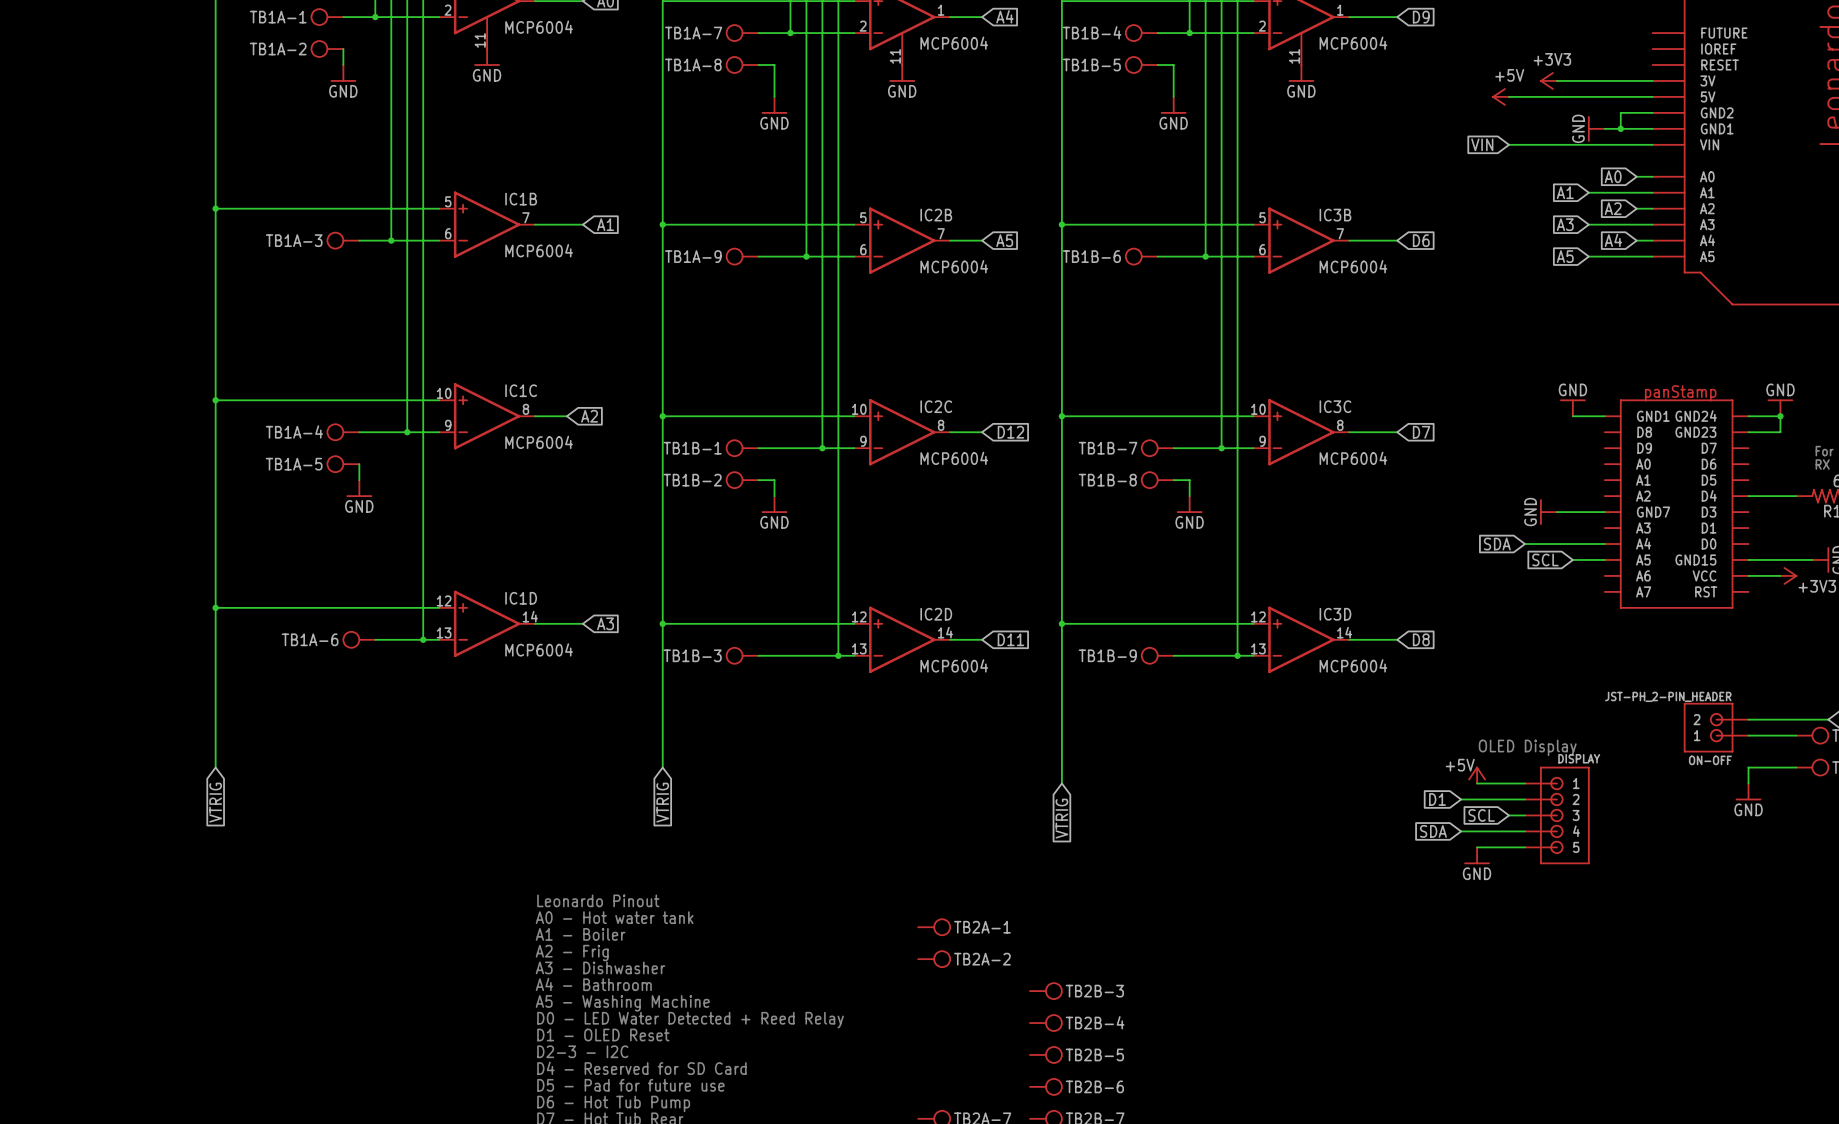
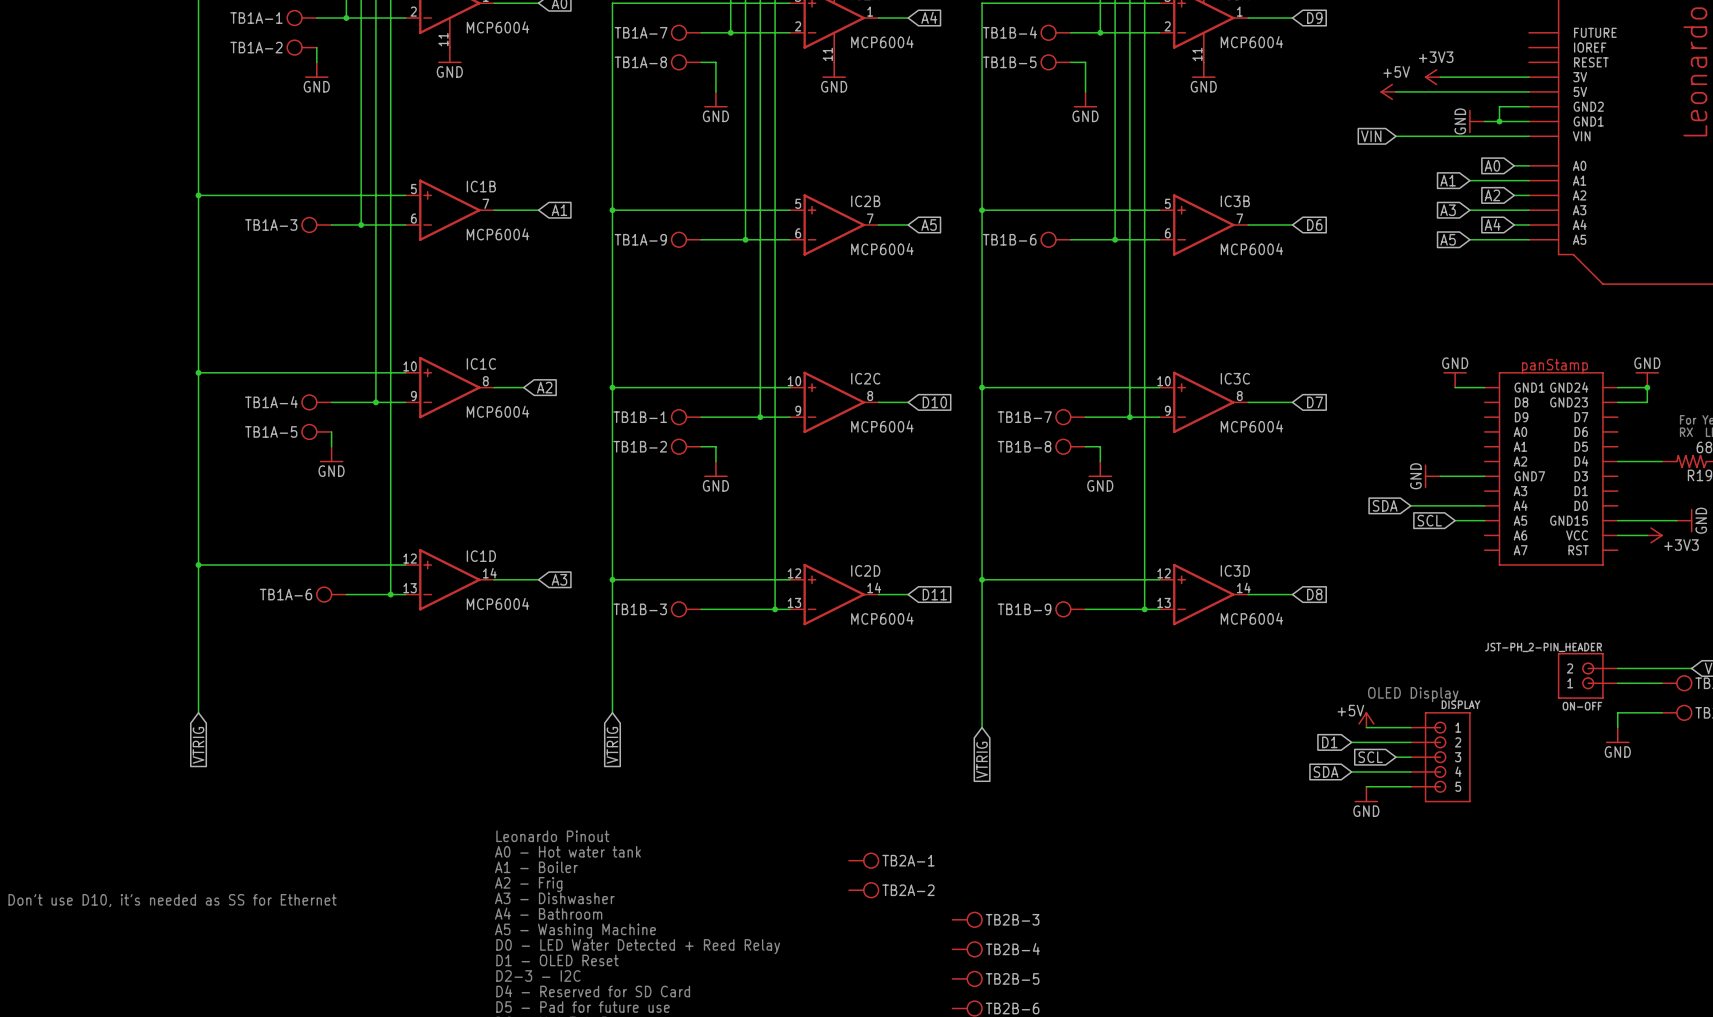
global label: D12 (1010, 432) -> D10 (934, 402)
text: none -> Don't use D10, it's needed as SS for Ethernet (172, 900)

